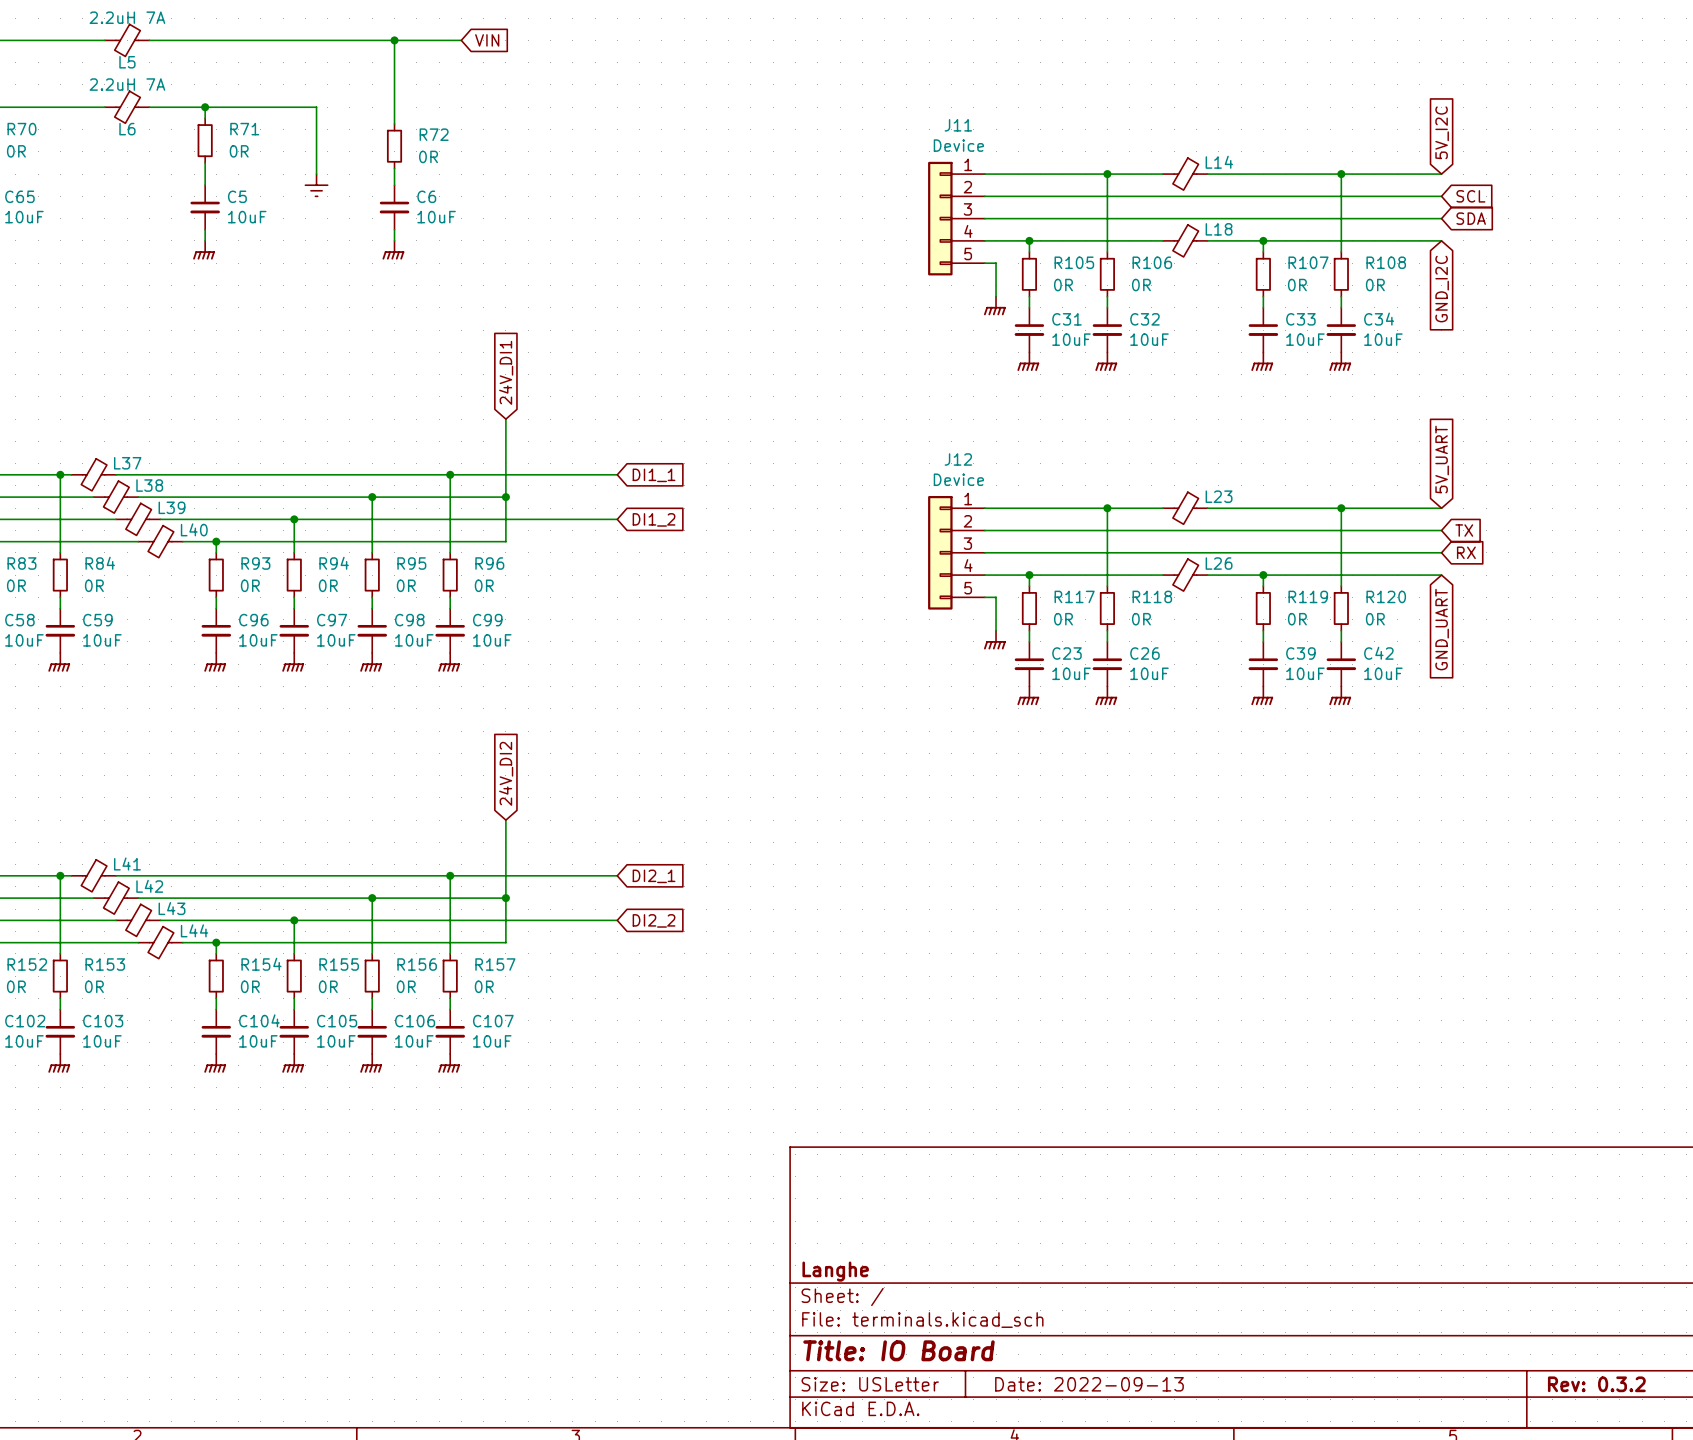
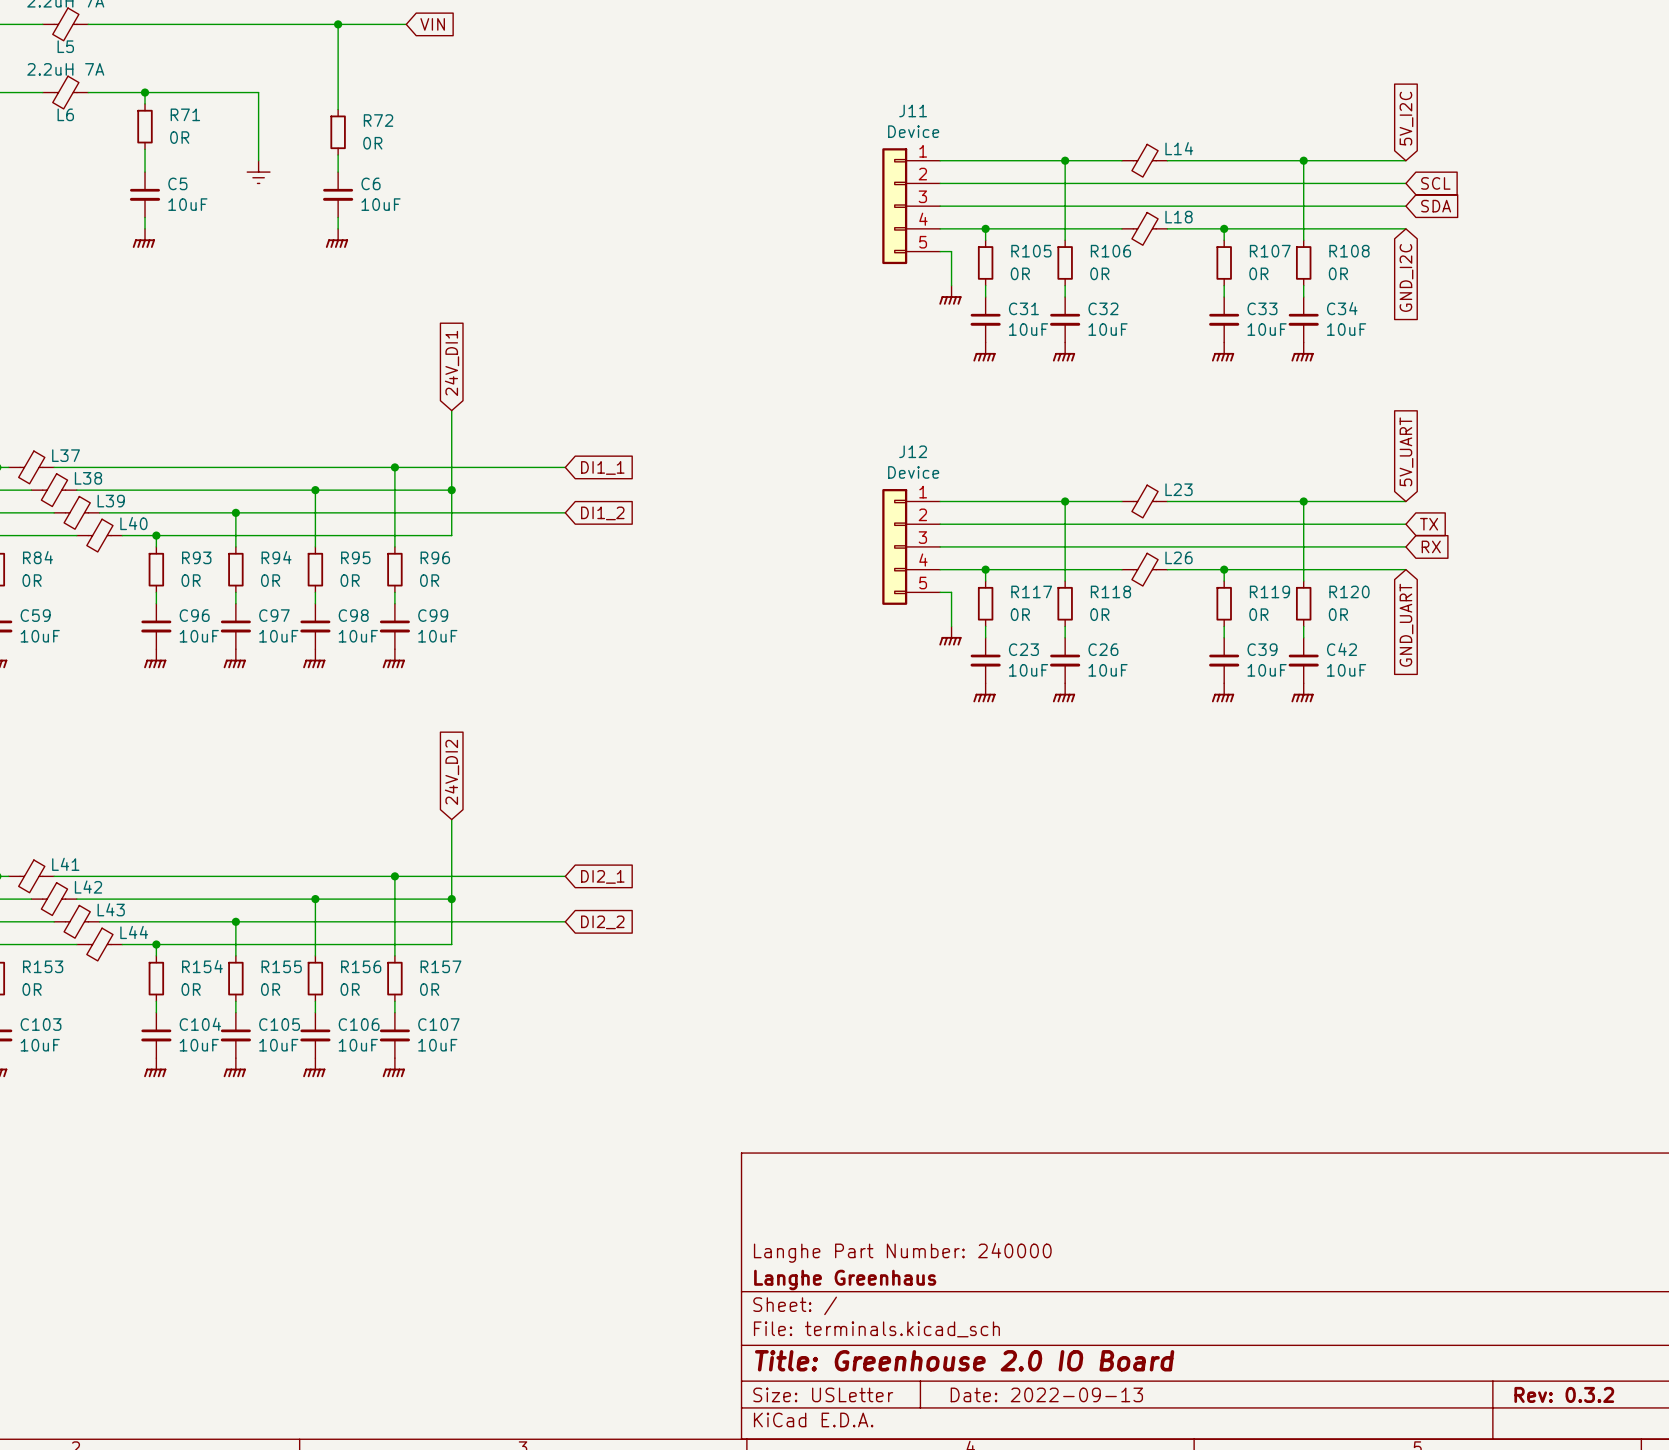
title block: none -> Langhe Part Number: 240000 (902, 1252)
title block: Langhe (835, 1271) -> Langhe Greenhaus (845, 1279)
title block: Title: IO Board (898, 1350) -> Title: Greenhouse 2.0 IO Board (964, 1360)

